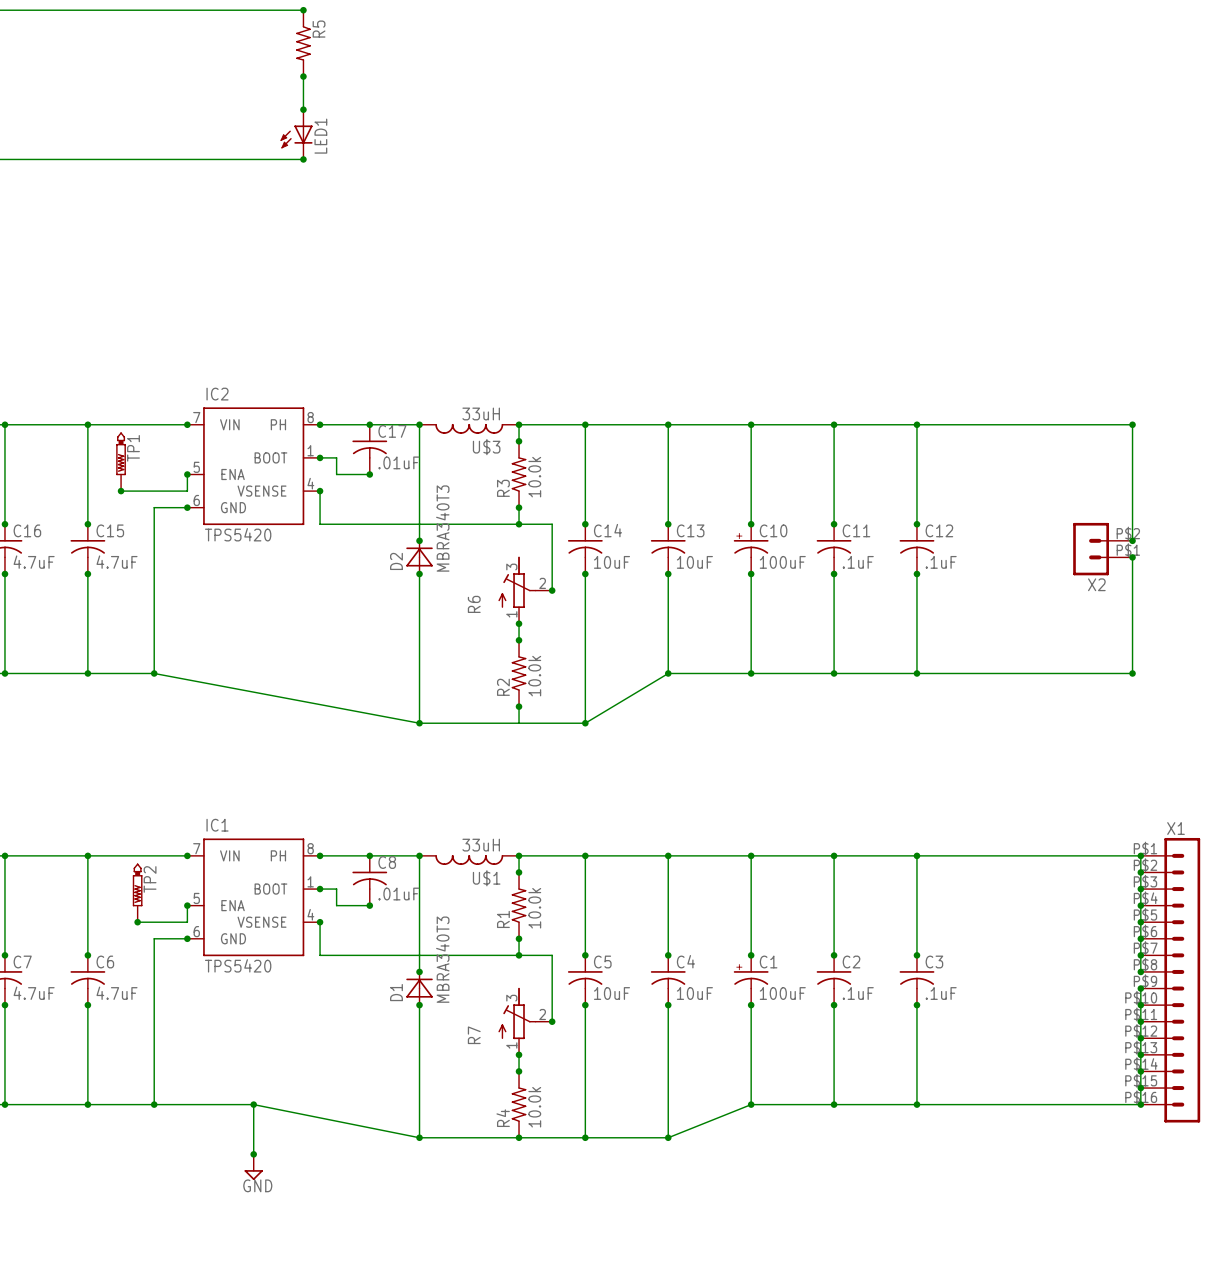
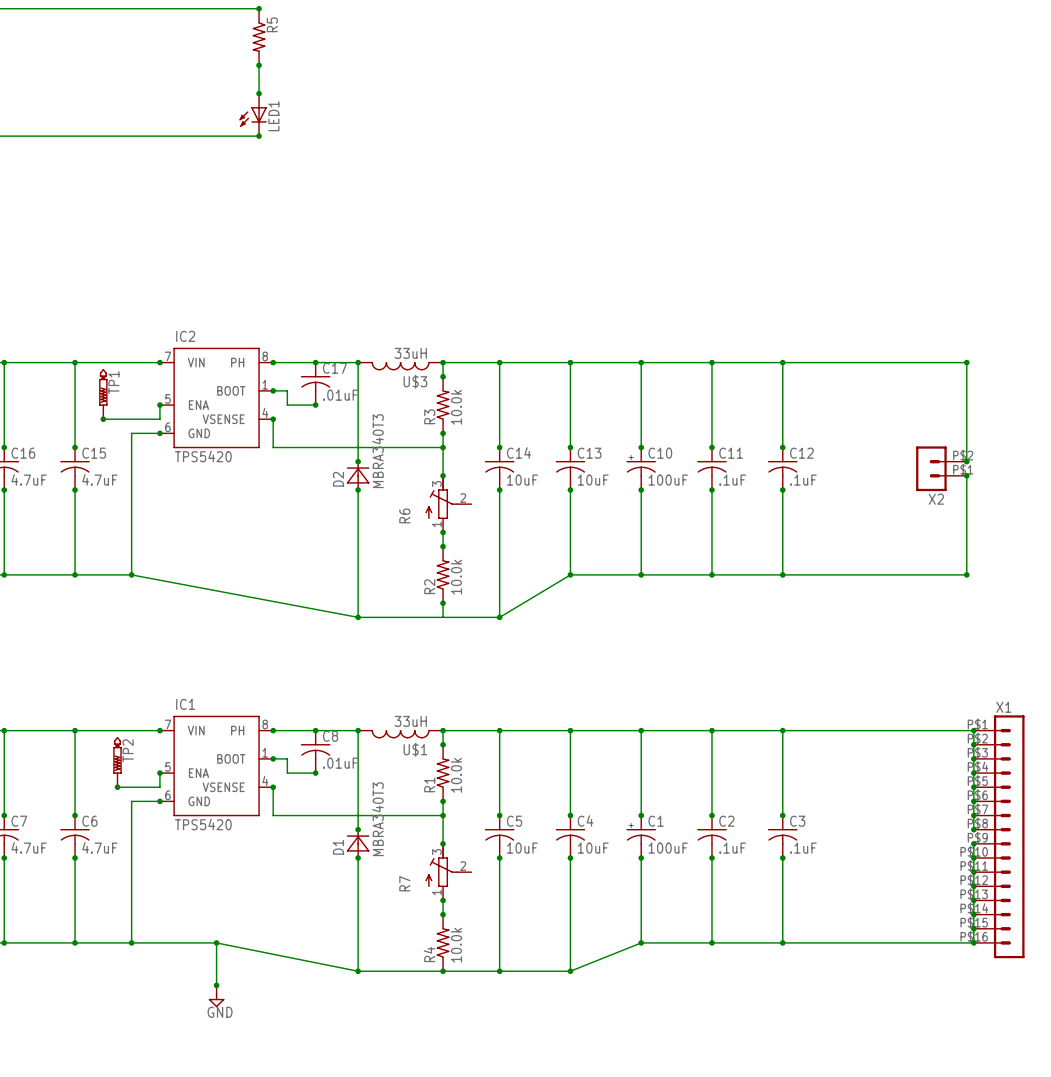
wire: (519, 524) (552, 524) (552, 590) -> (443, 447) (443, 475)
junction: none -> (443, 475)
junction: (552, 590) -> none
wire: (519, 955) (552, 955) (552, 1021) -> (443, 815) (443, 843)
junction: none -> (443, 843)
junction: (552, 1021) -> none

